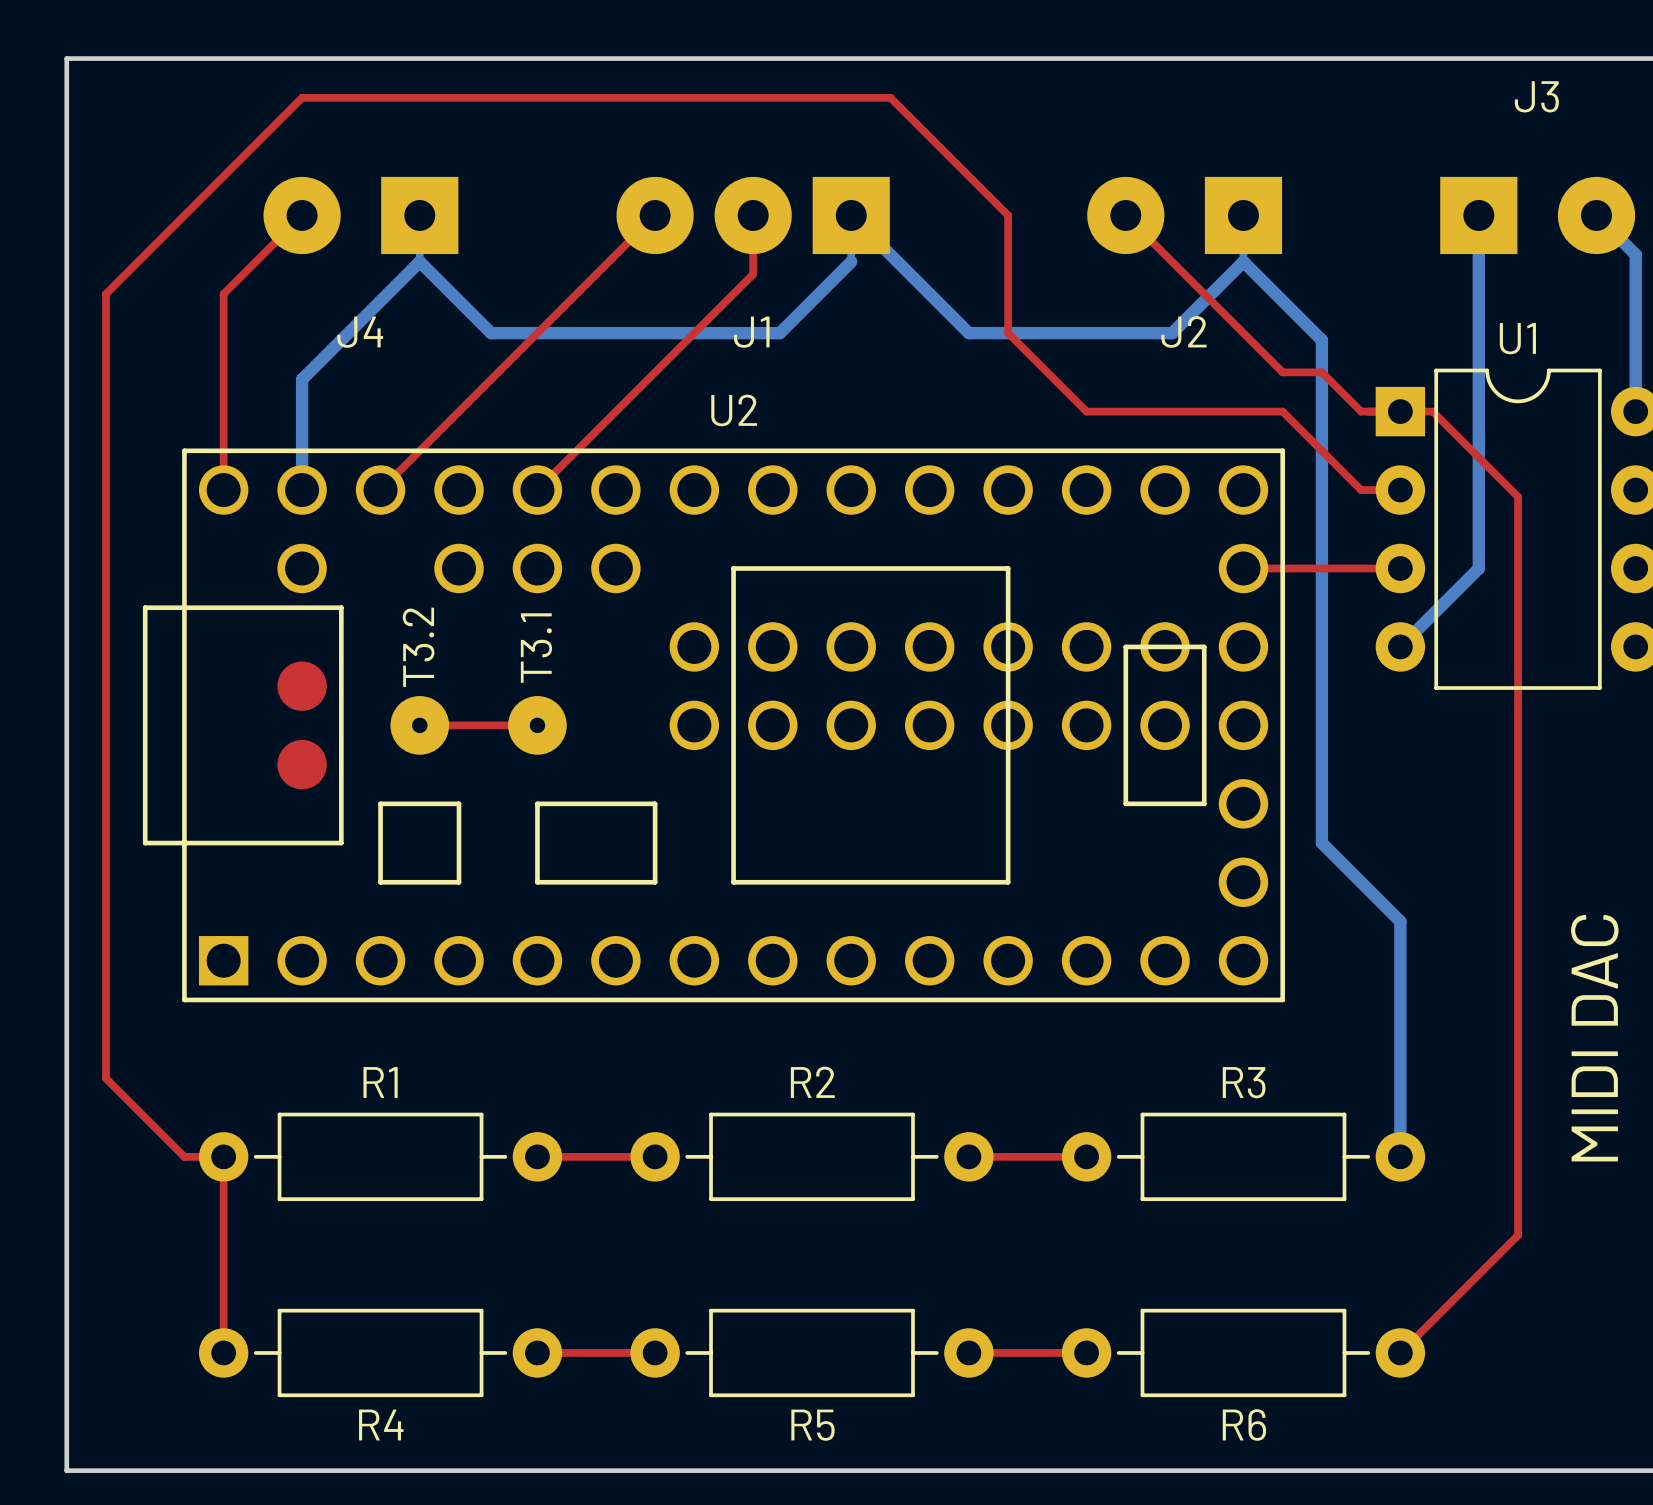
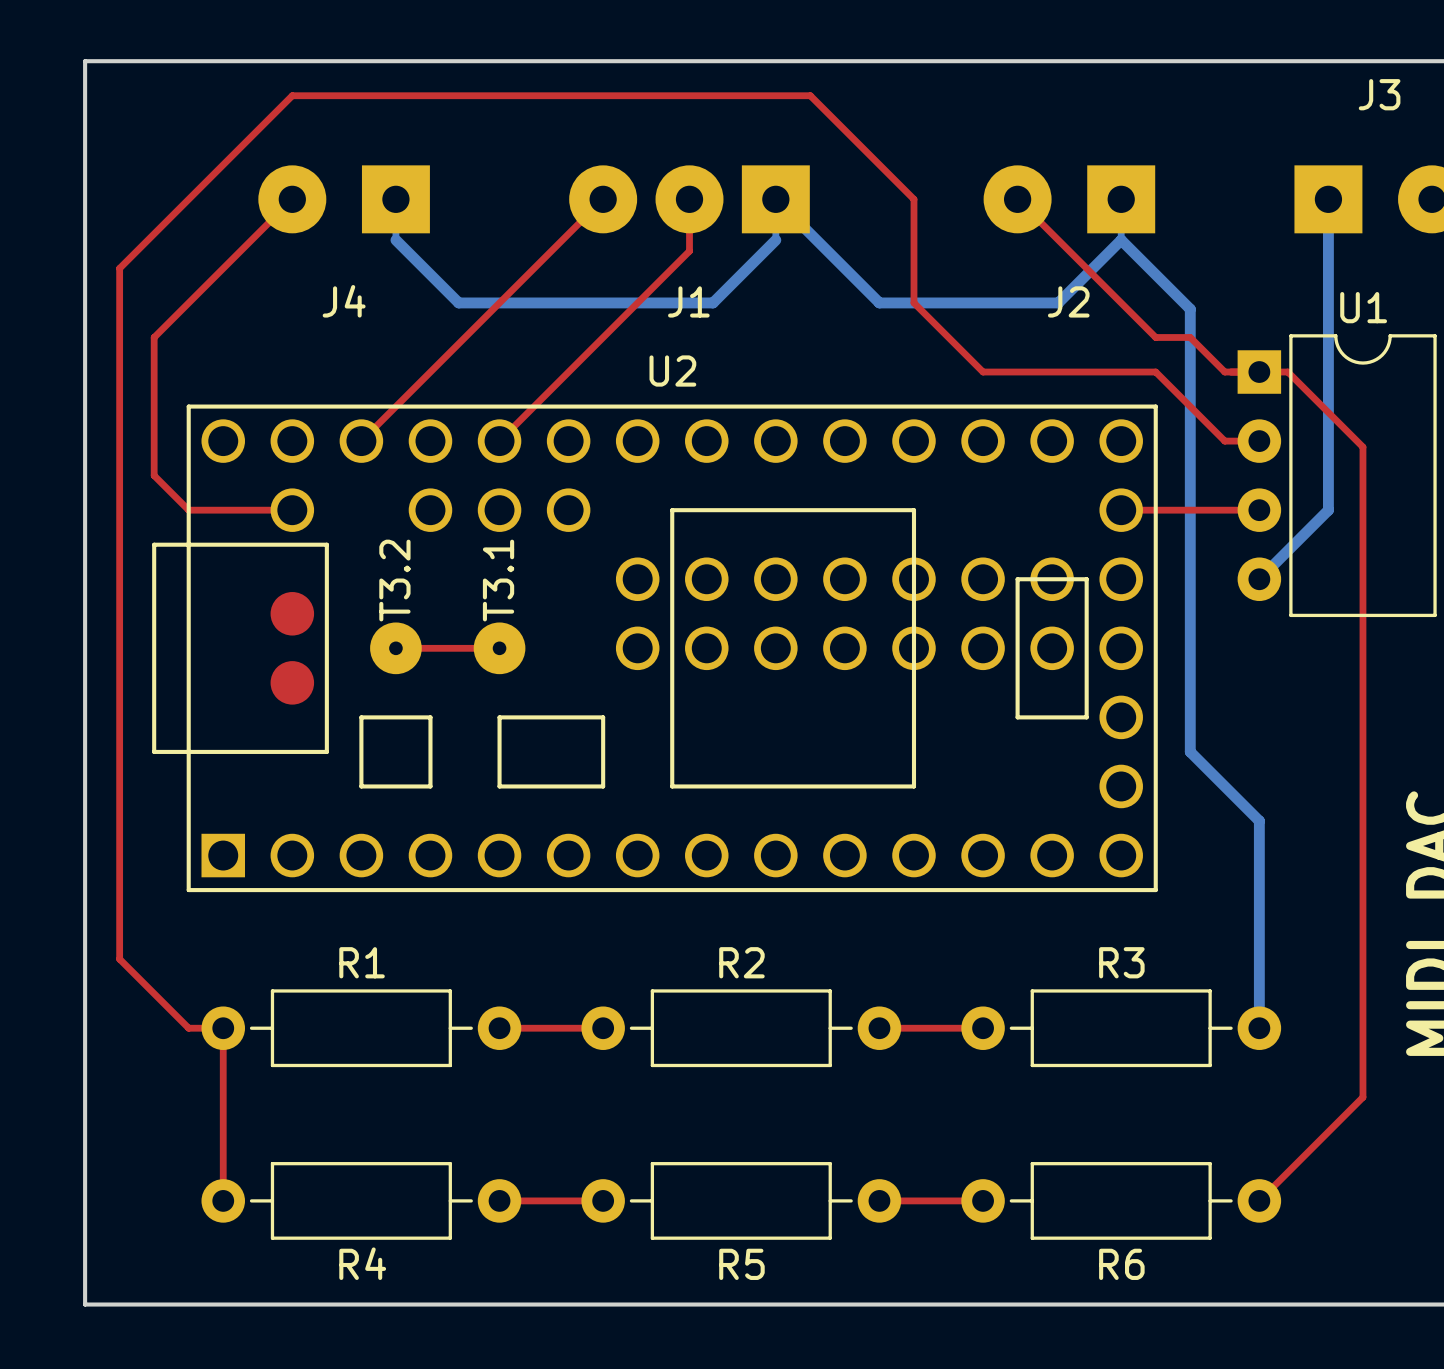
bottom track: (419, 261) (302, 379) (302, 490) -> none
top track: (223, 293) (223, 490) -> (223, 268) (154, 337) (154, 475) (188, 510) (292, 510)

